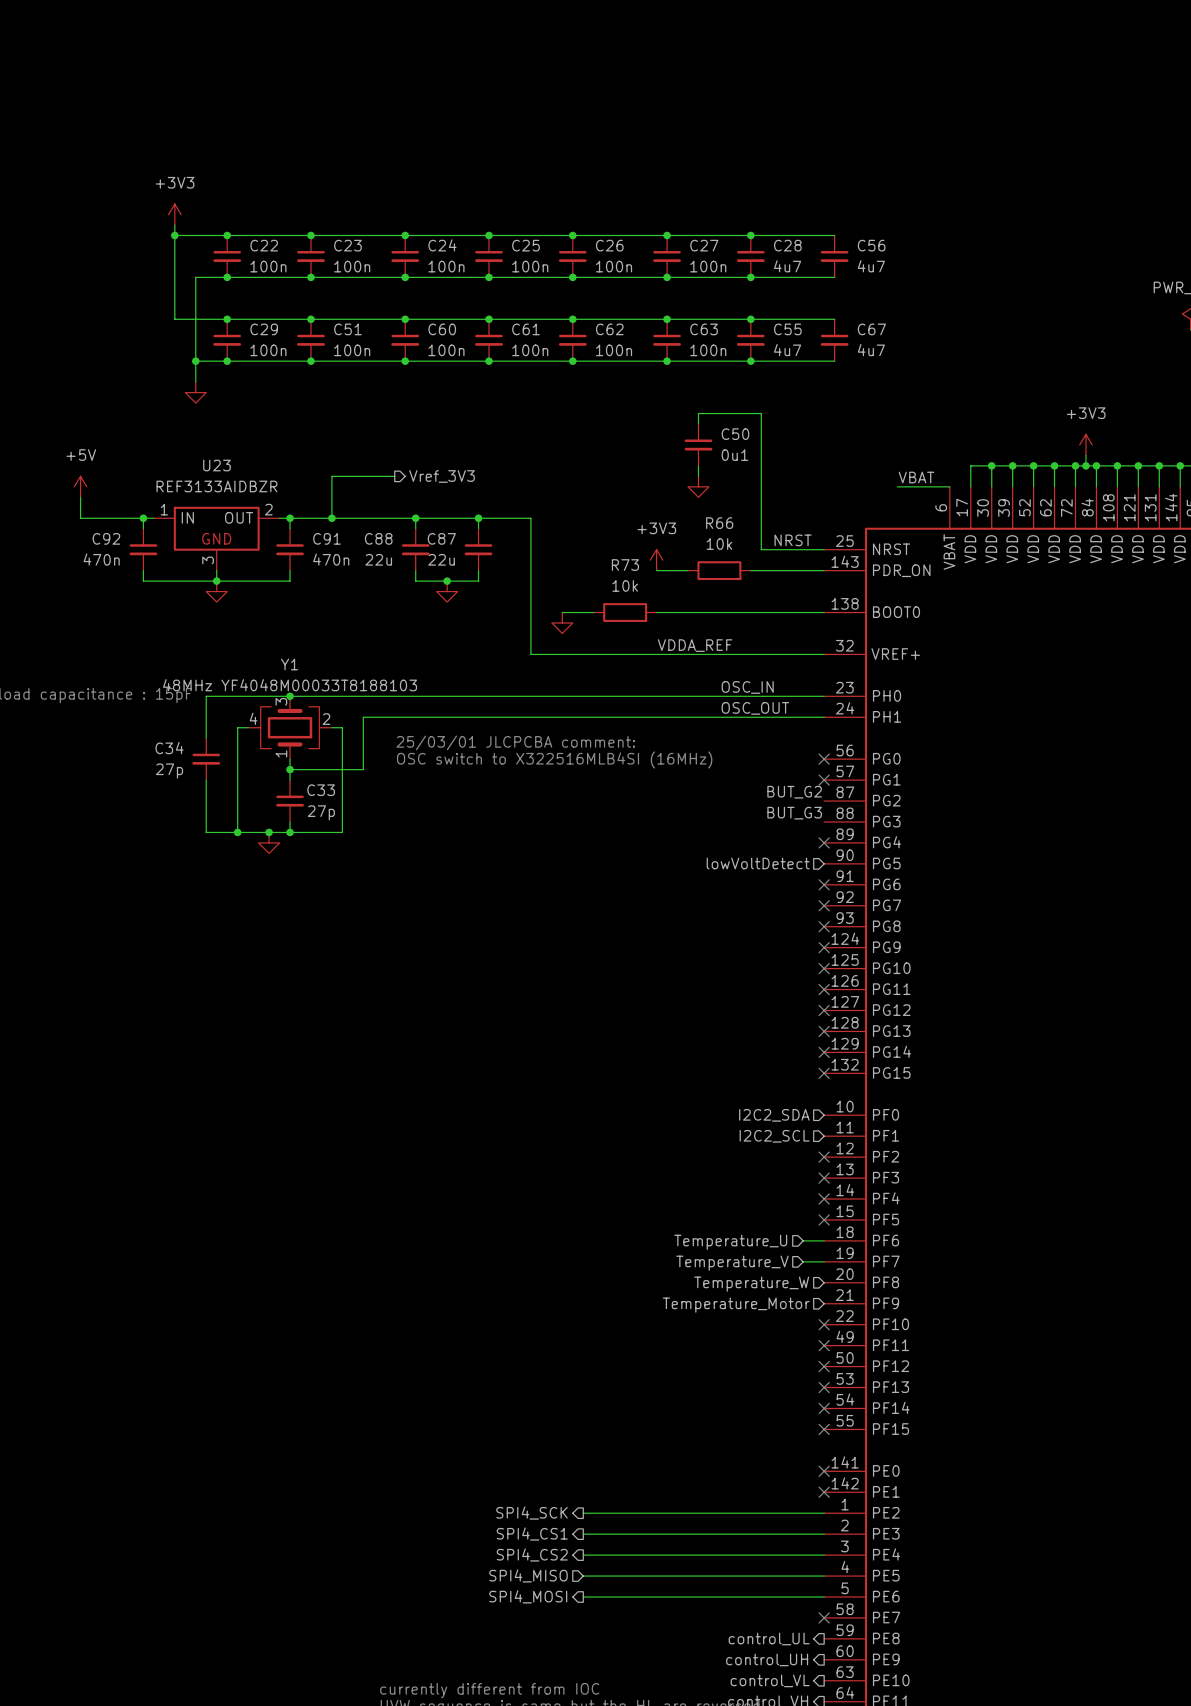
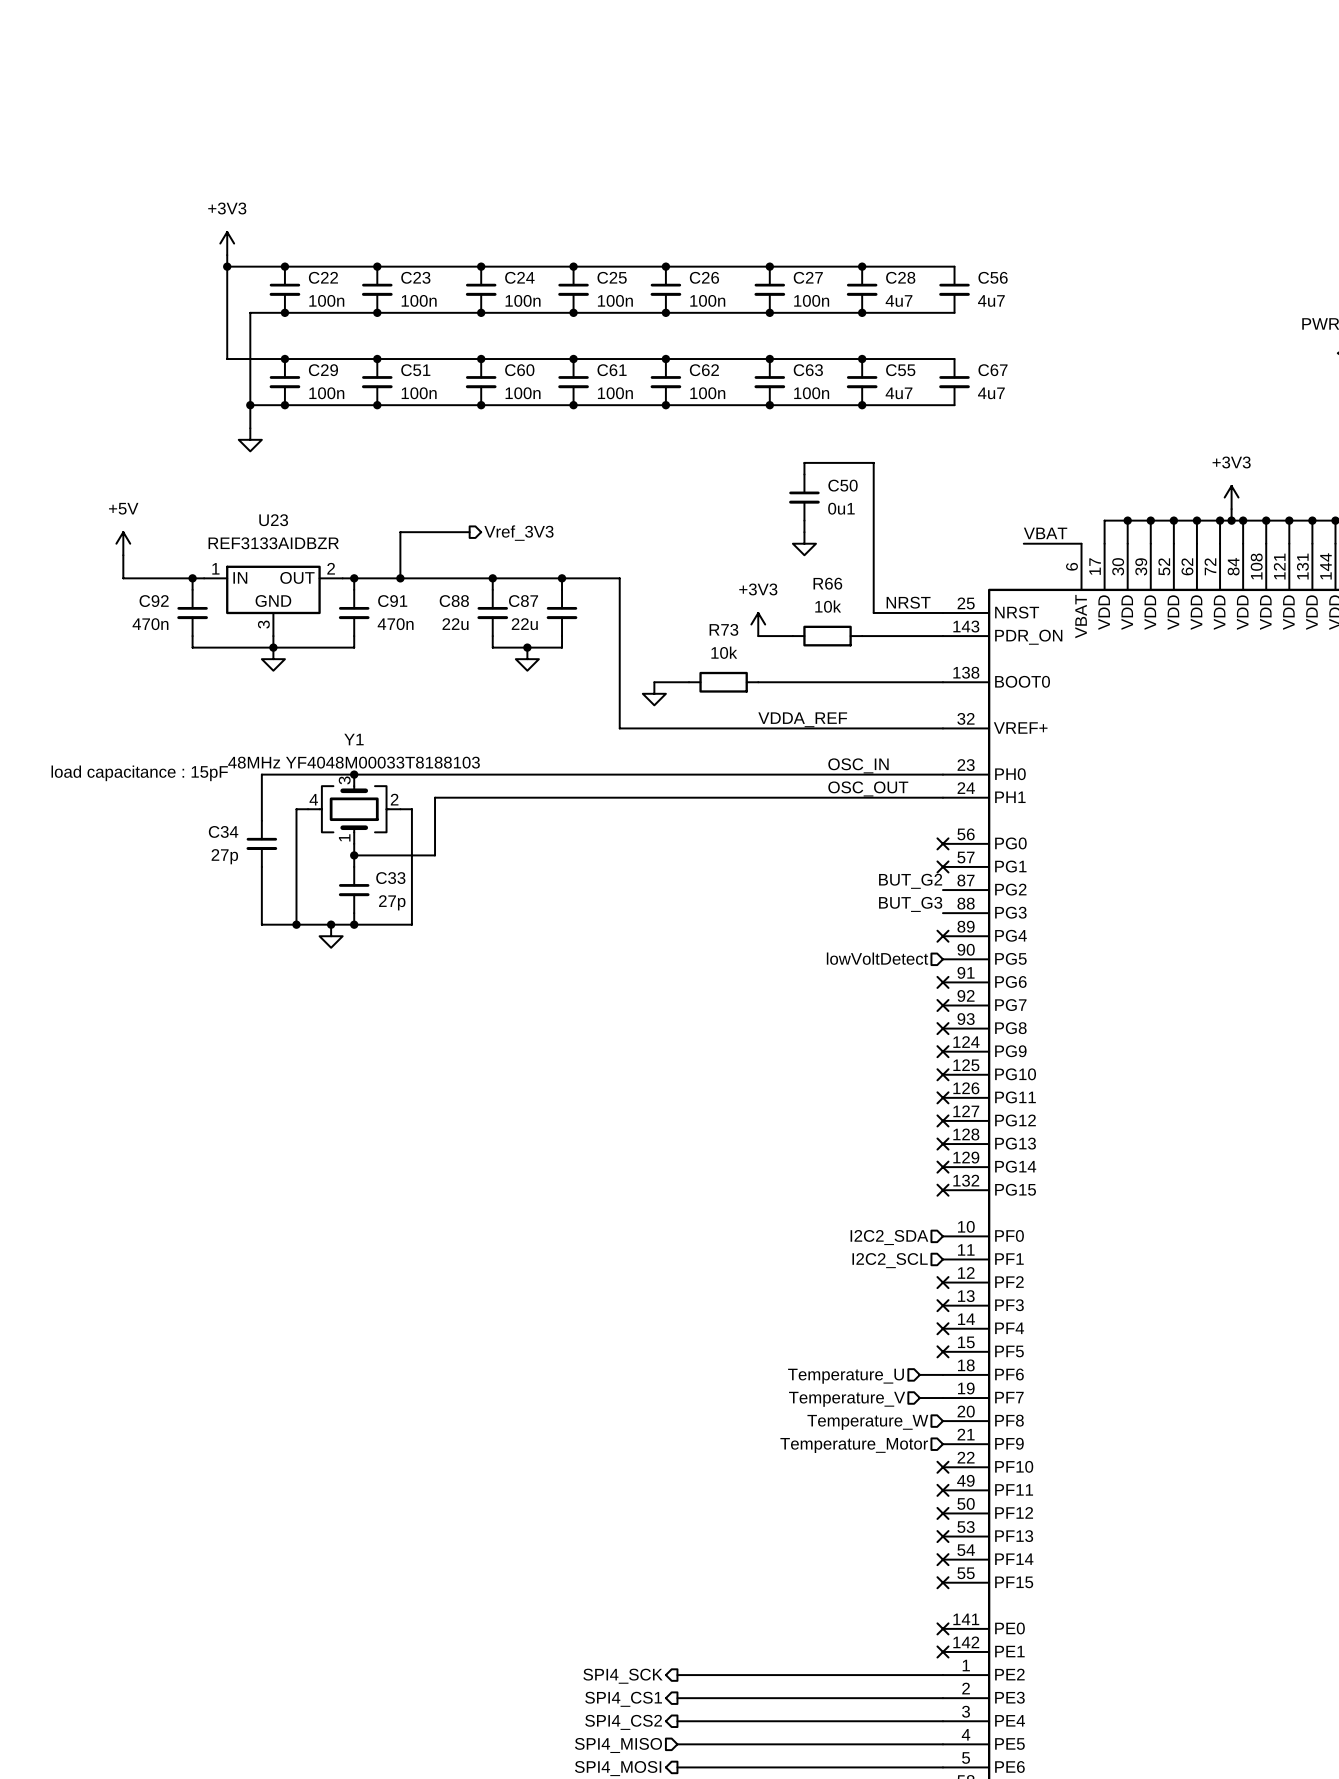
text: 25/03/01 JLCPCBA comment: (515, 742) -> none
text: OSC switch to X322516MLB4SI (16MHz) (554, 759) -> none

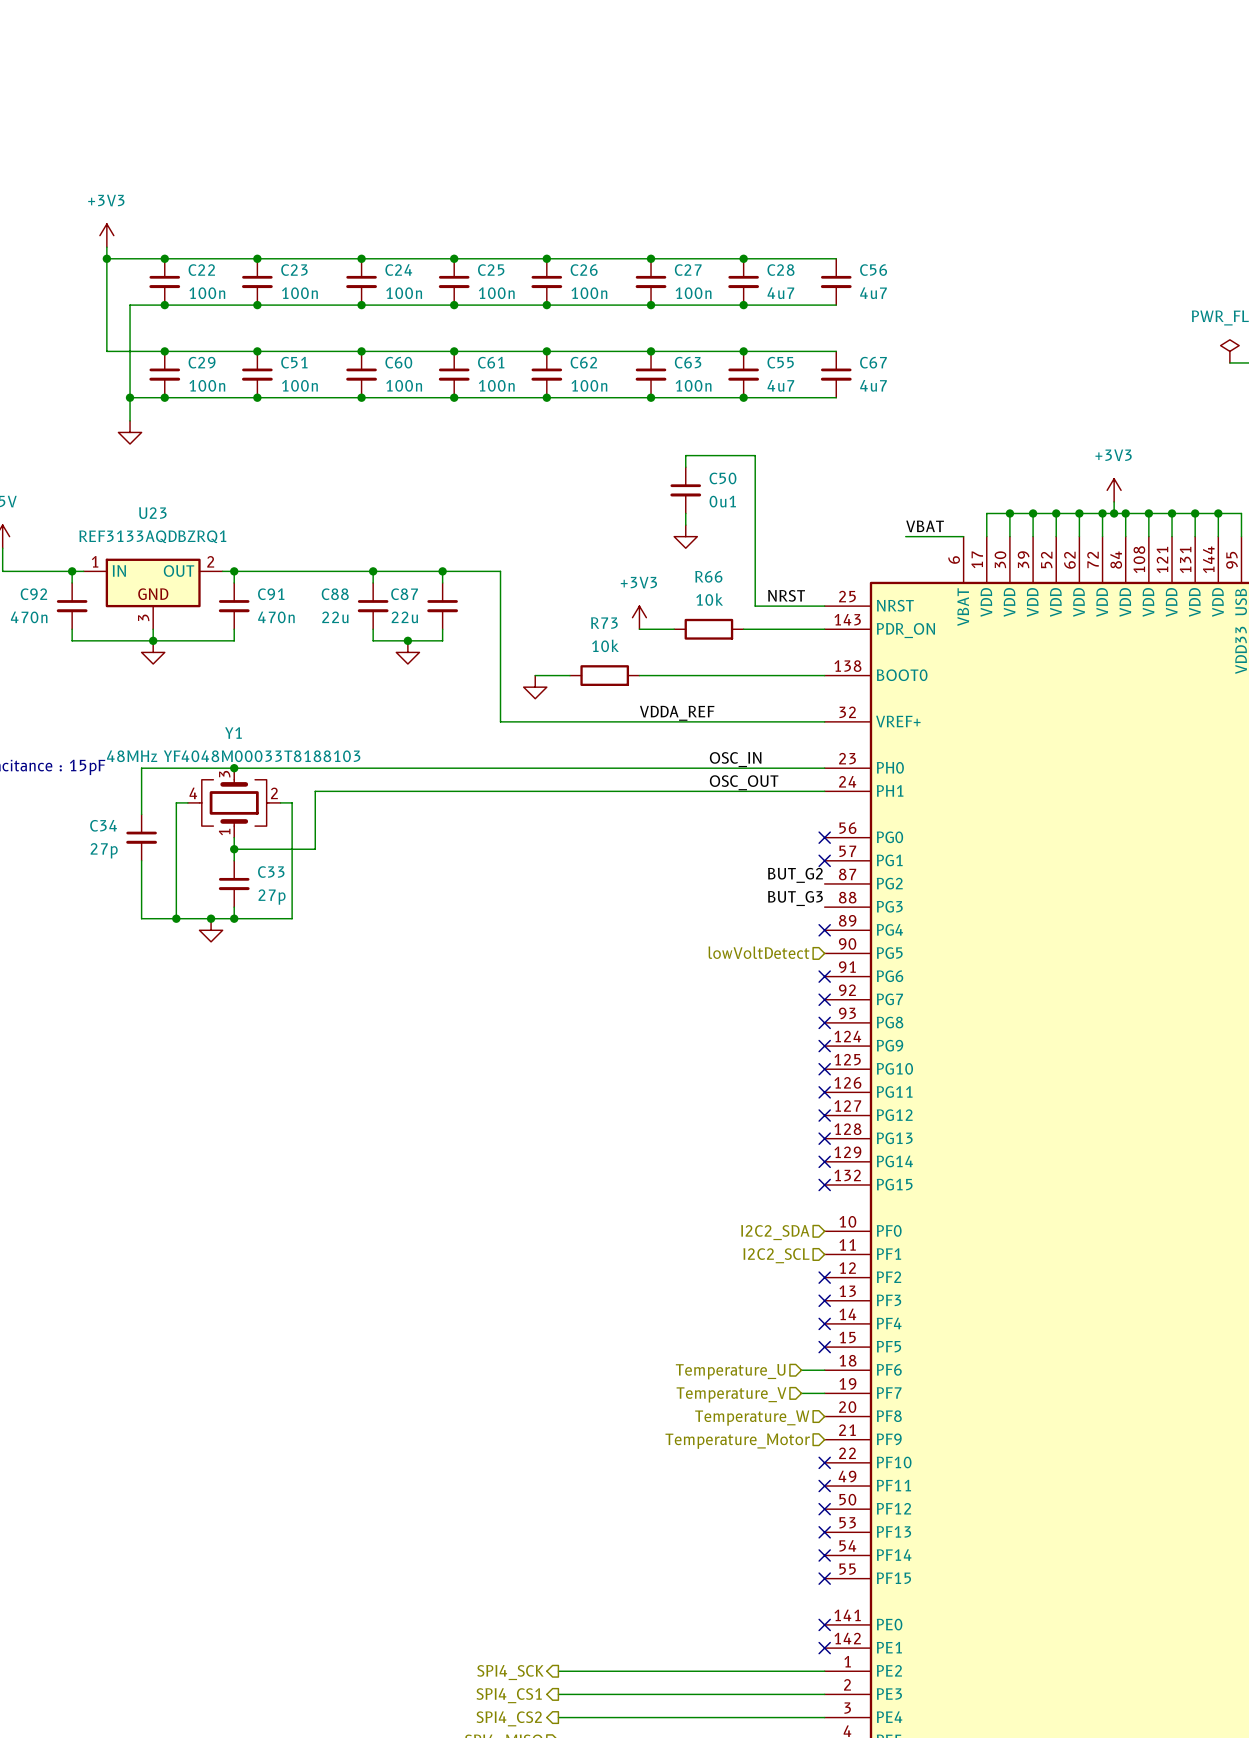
wire: (469, 532) (400, 532) (400, 578) -> none
hierarchical label: Vref_3V3 (518, 533) -> none
U23 value: REF3133AIDBZR (273, 543) -> REF3133AQDBZRQ1 (152, 536)
junction: (400, 578) -> none

